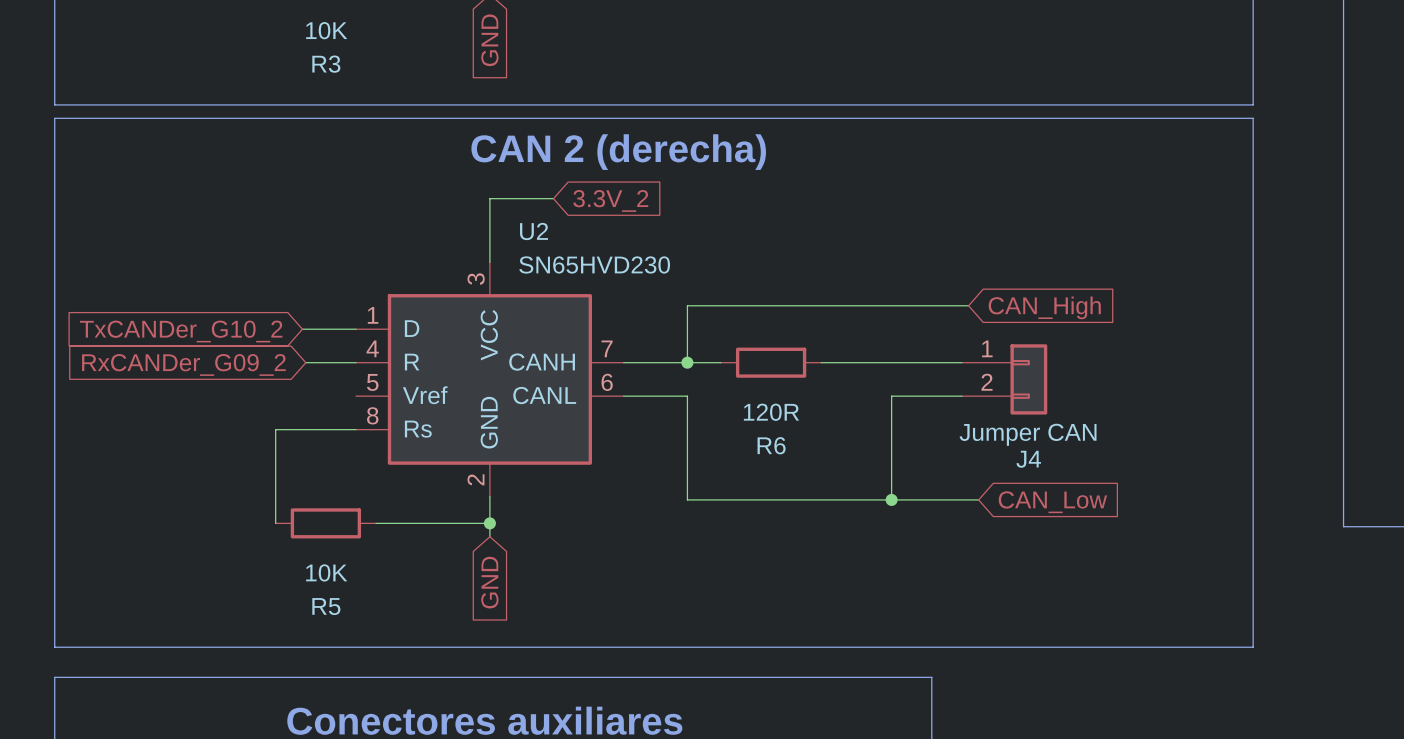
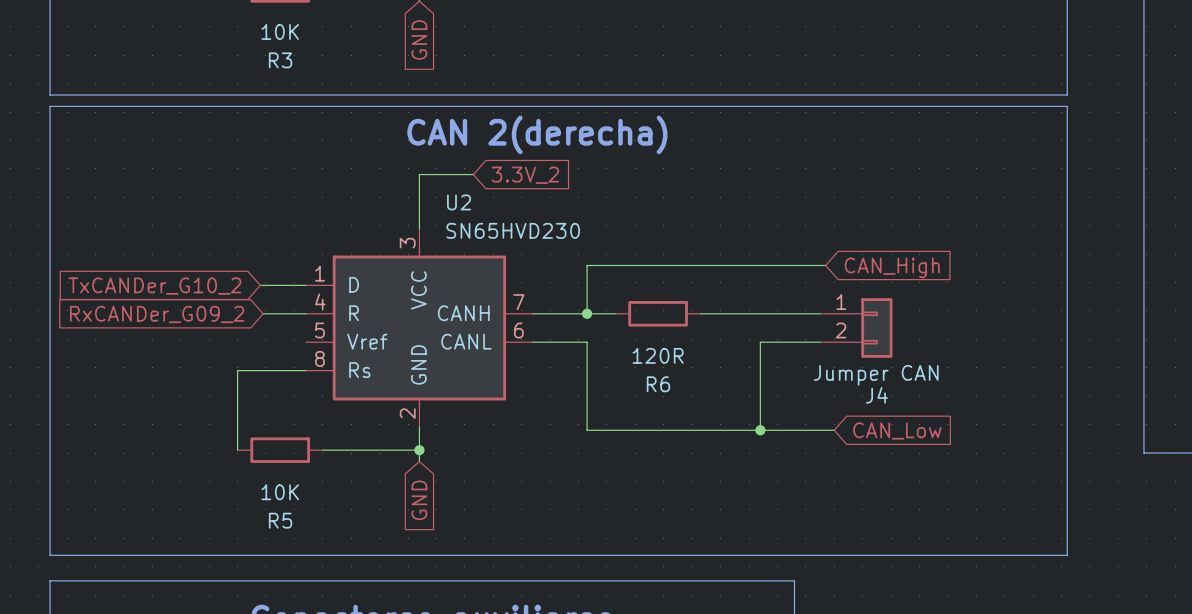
text: CAN 2 (derecha) (618, 152) -> CAN 2(derecha) (537, 134)

